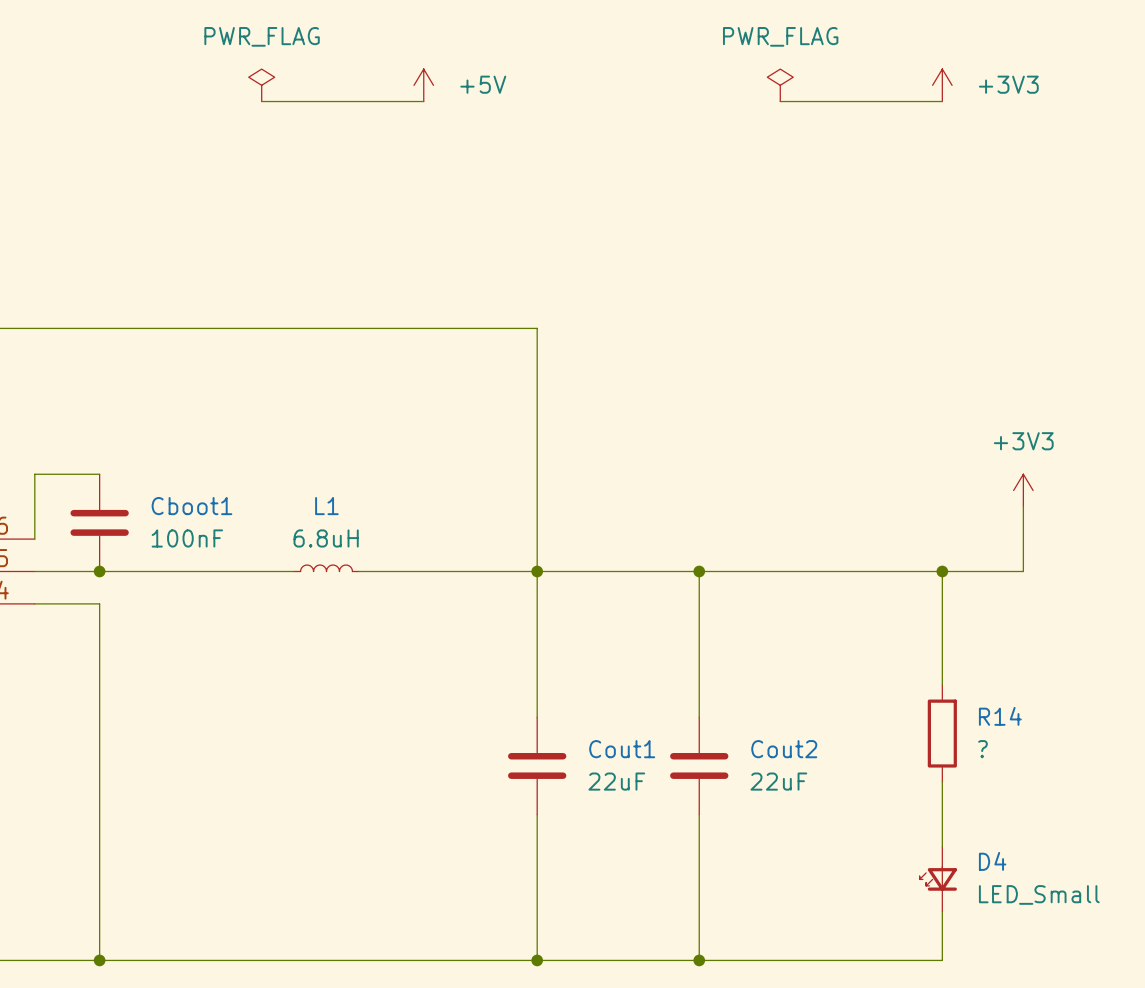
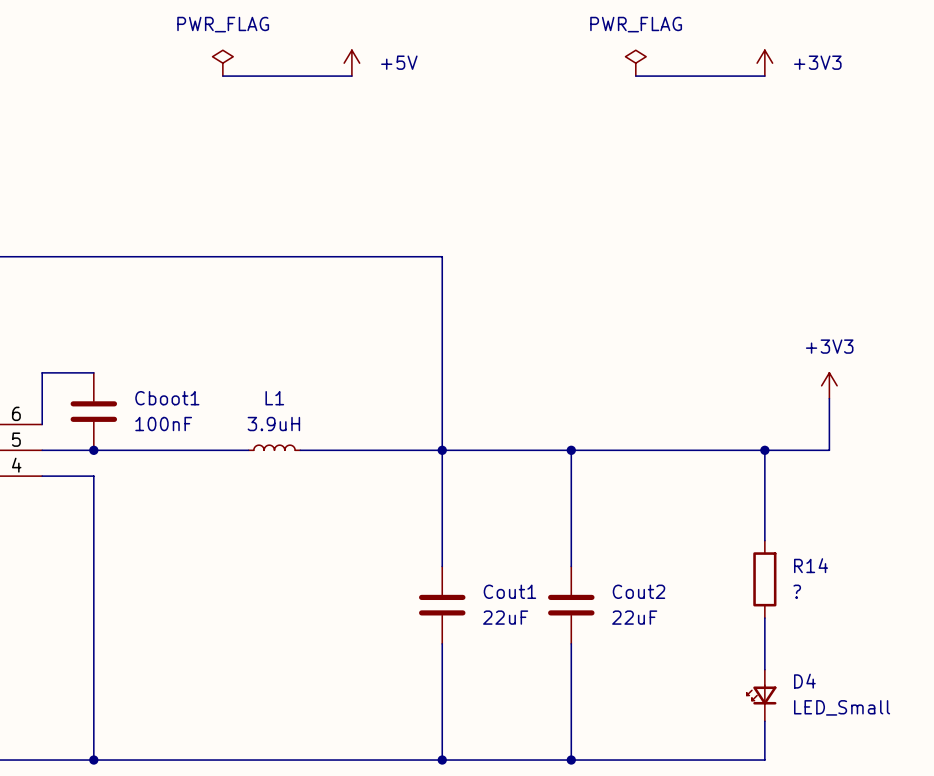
L1 value: 6.8uH (326, 538) -> 3.9uH (273, 424)

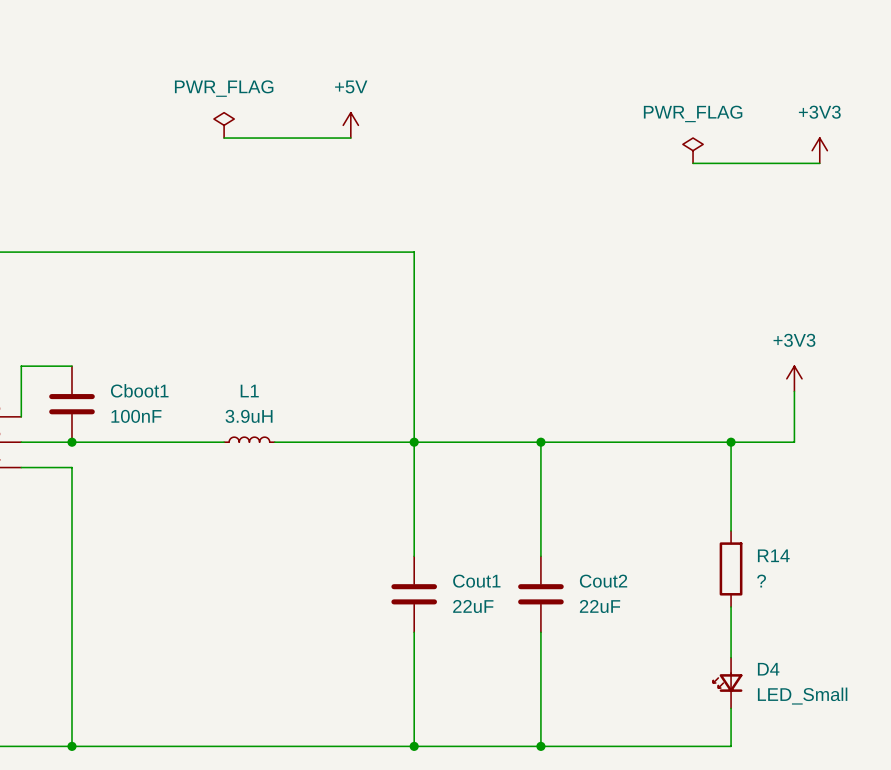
power symbol text position: +5V (399, 62) -> +5V (351, 86)
power symbol text position: +3V3 (817, 62) -> +3V3 (819, 112)
power symbol position: PWR_FLAG (222, 63) -> PWR_FLAG (224, 125)
power symbol position: +5V (351, 63) -> +5V (350, 125)
power symbol position: PWR_FLAG (635, 63) -> PWR_FLAG (693, 150)
power symbol position: +3V3 (764, 63) -> +3V3 (819, 150)
wire: (222, 76) (351, 76) -> (224, 138) (350, 138)
wire: (635, 76) (764, 76) -> (693, 163) (819, 163)

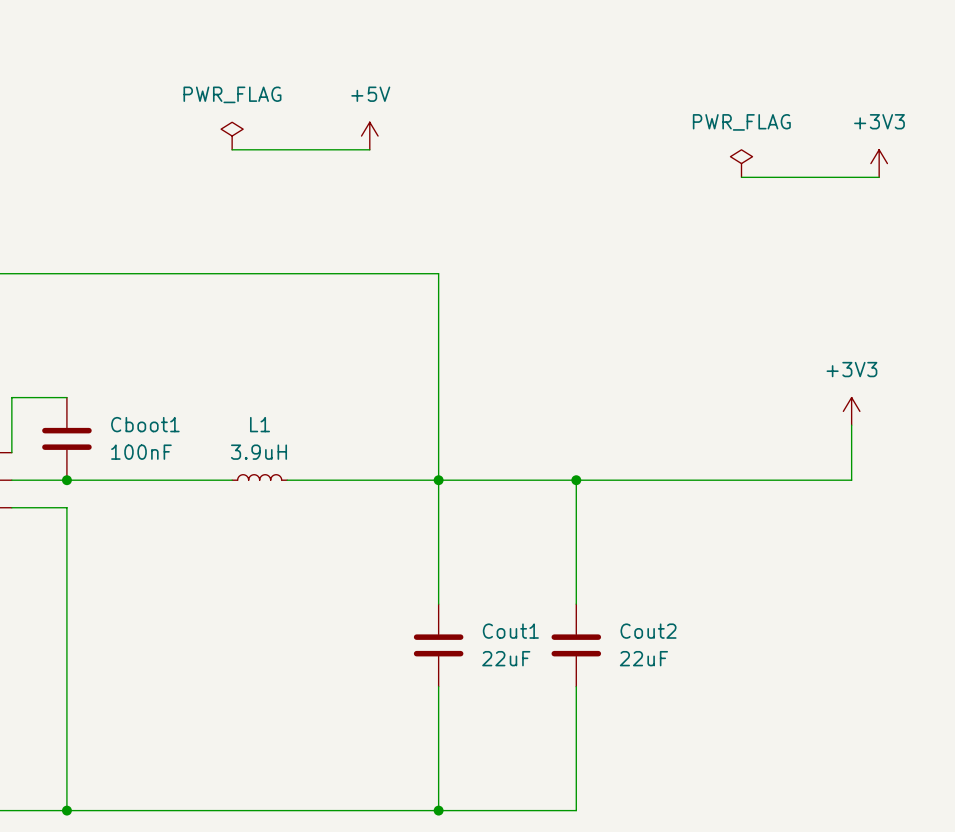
wire: (731, 442) (731, 530) -> none
junction: (731, 442) -> none
R14: ? (731, 568) -> none
wire: (731, 606) (731, 657) -> none
D4: LED_Small (727, 683) -> none
wire: (731, 708) (731, 746) (540, 746) -> none
junction: (540, 746) -> none

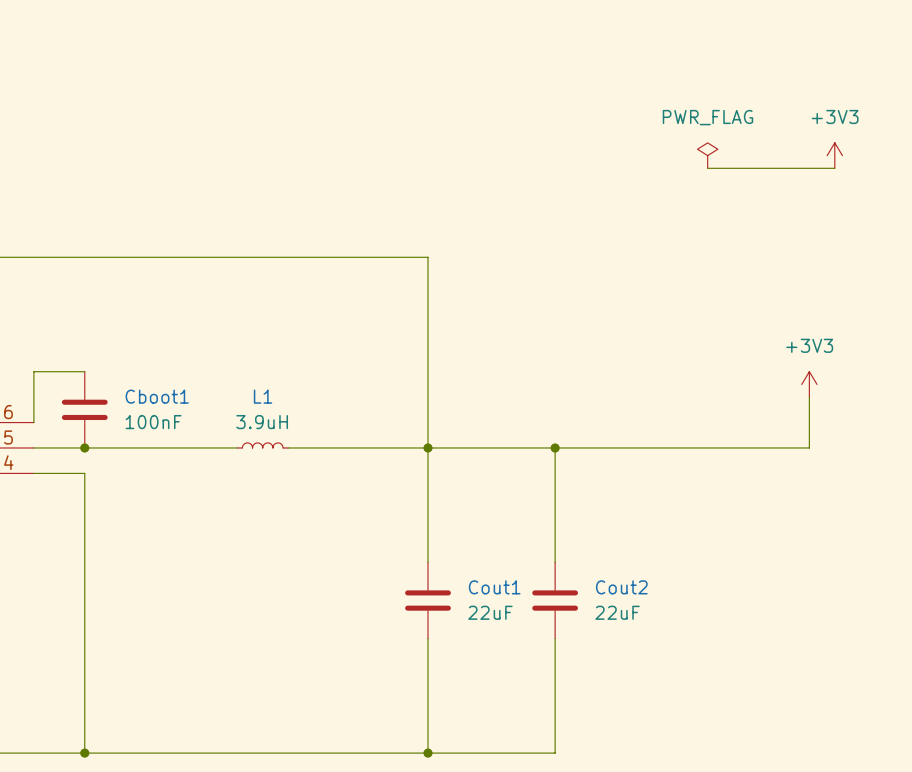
power symbol: PWR_FLAG (232, 136) -> none
power symbol: +5V (369, 136) -> none
wire: (232, 149) (369, 149) -> none

